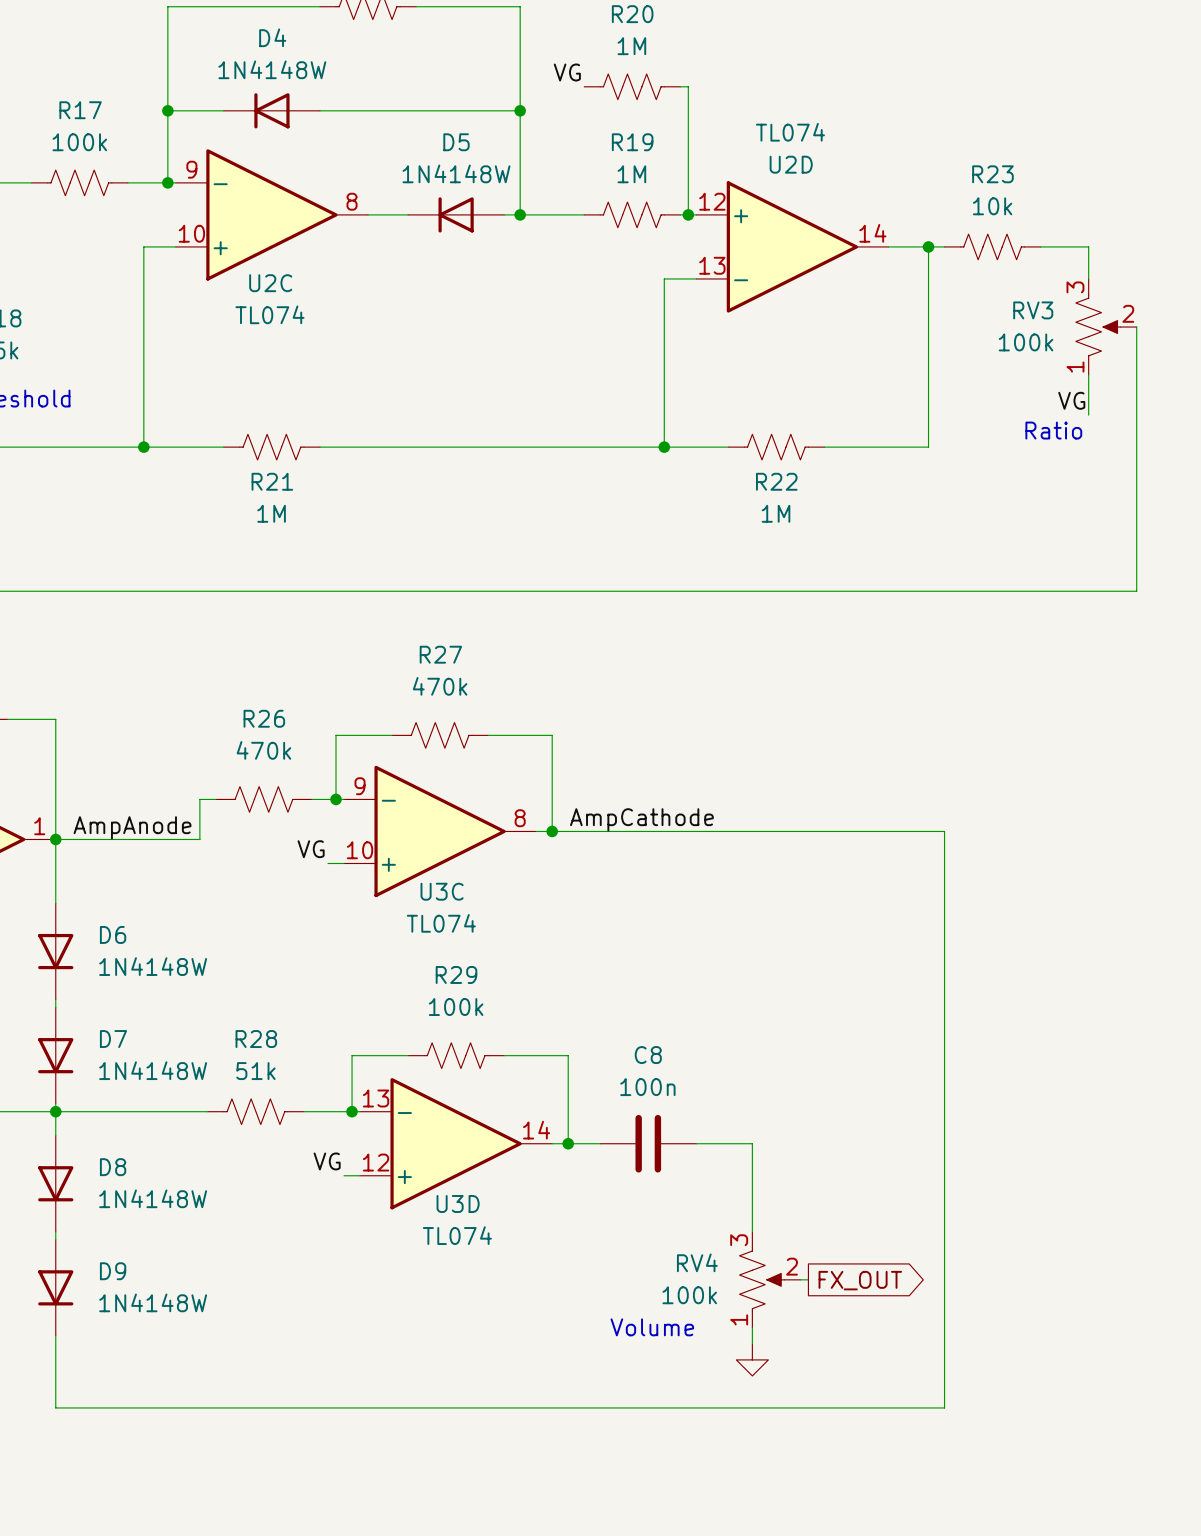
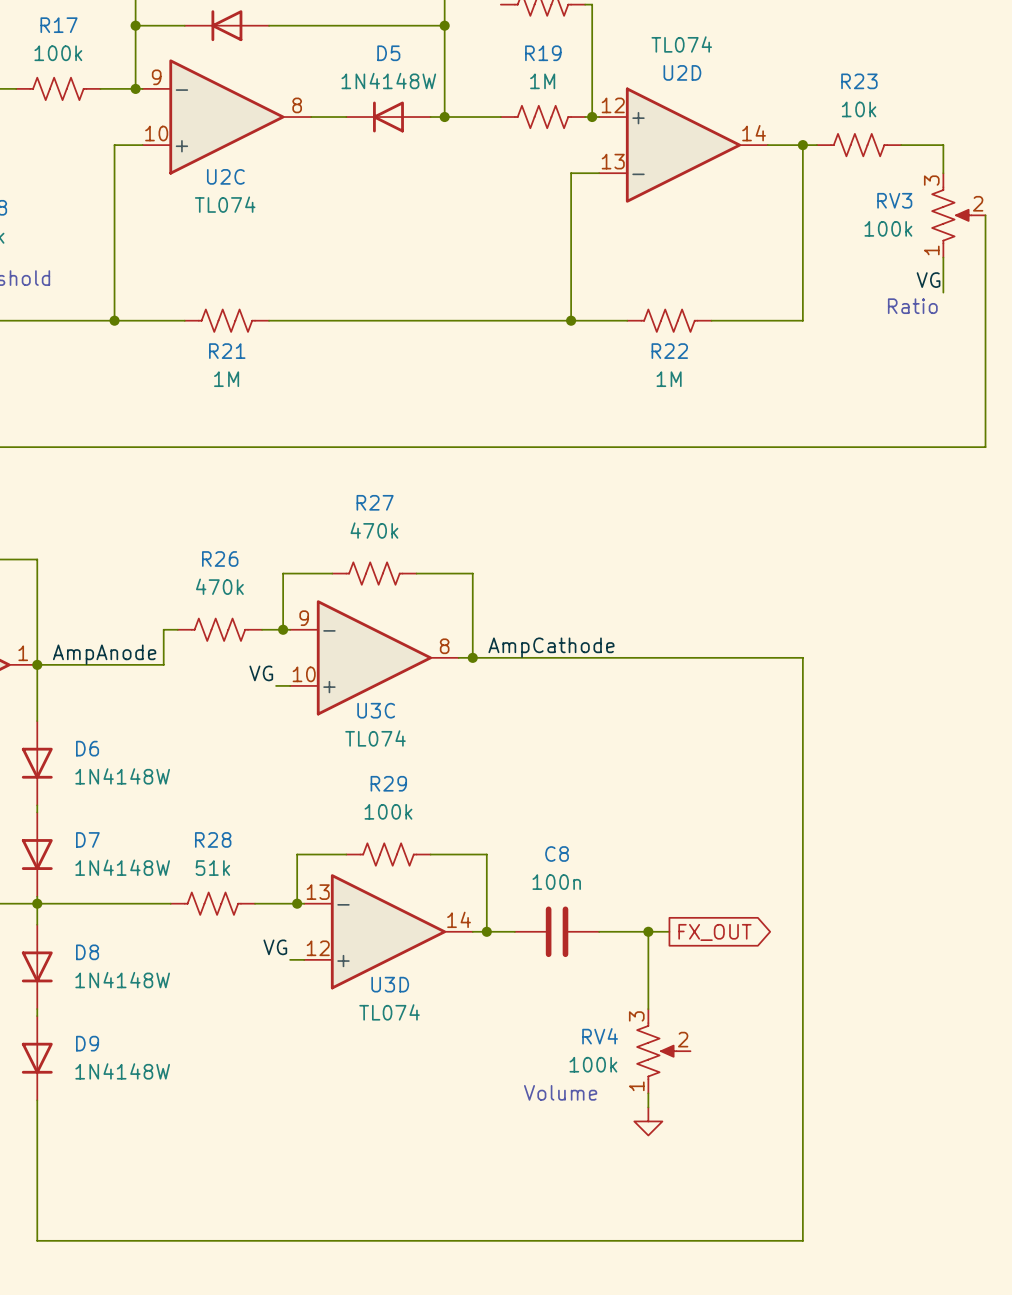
wire: (928, 831) (944, 831) (944, 1407) (55, 1407) -> (802, 657) (802, 1240) (37, 1240) (37, 1163)
wire: none -> (648, 931) (669, 931)
junction: none -> (648, 931)
wire: (800, 1279) (808, 1279) -> none
global label position: FX_OUT (860, 1280) -> FX_OUT (714, 932)

